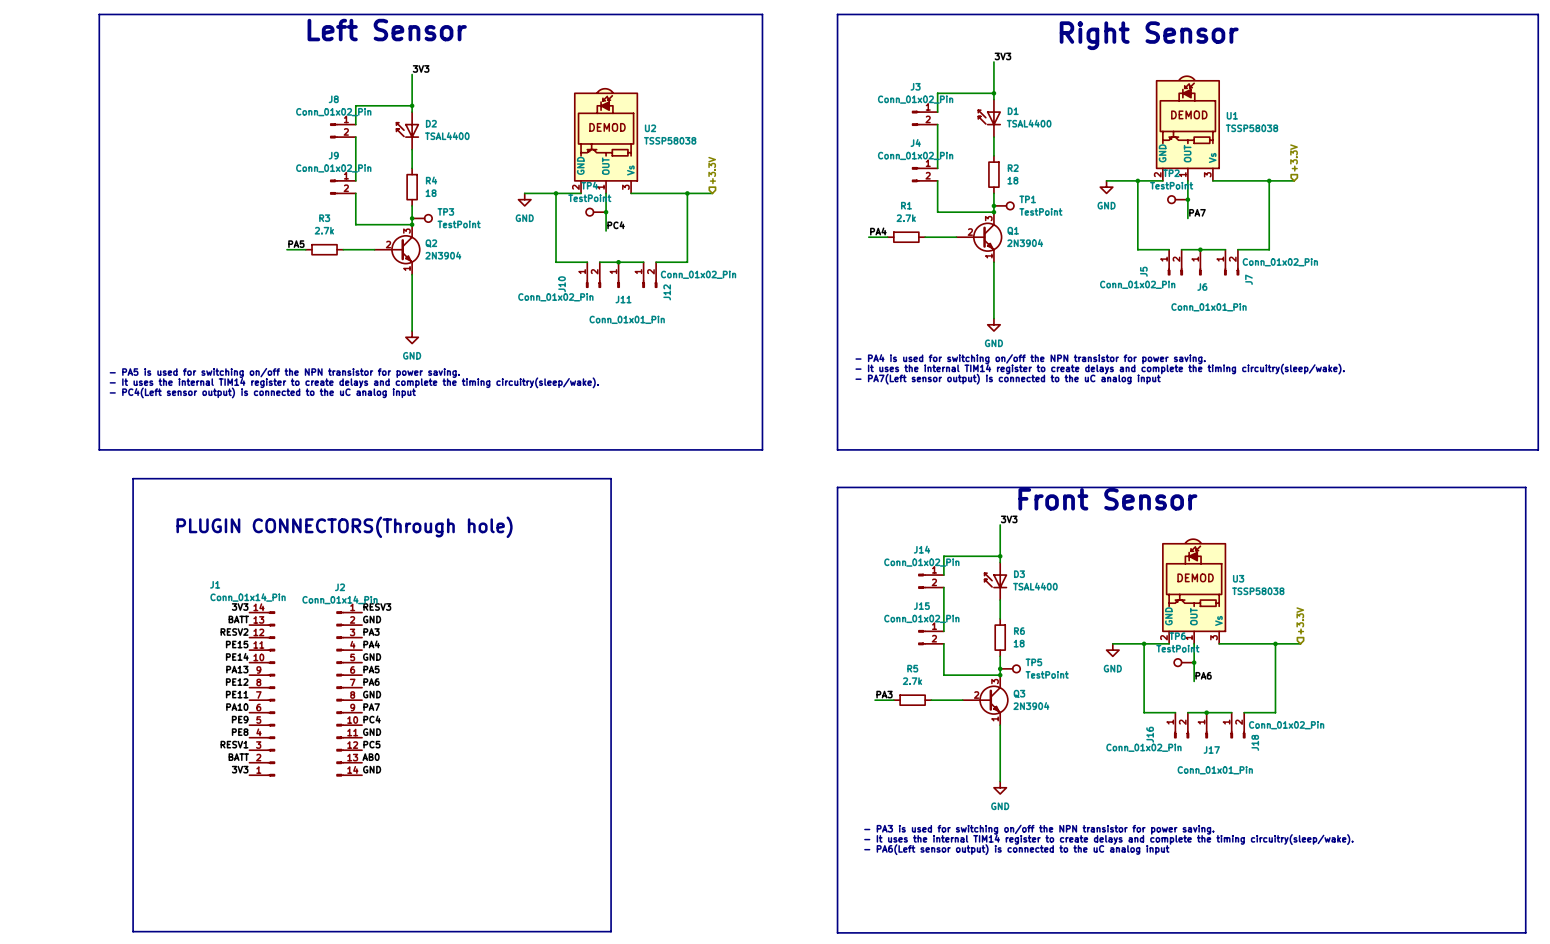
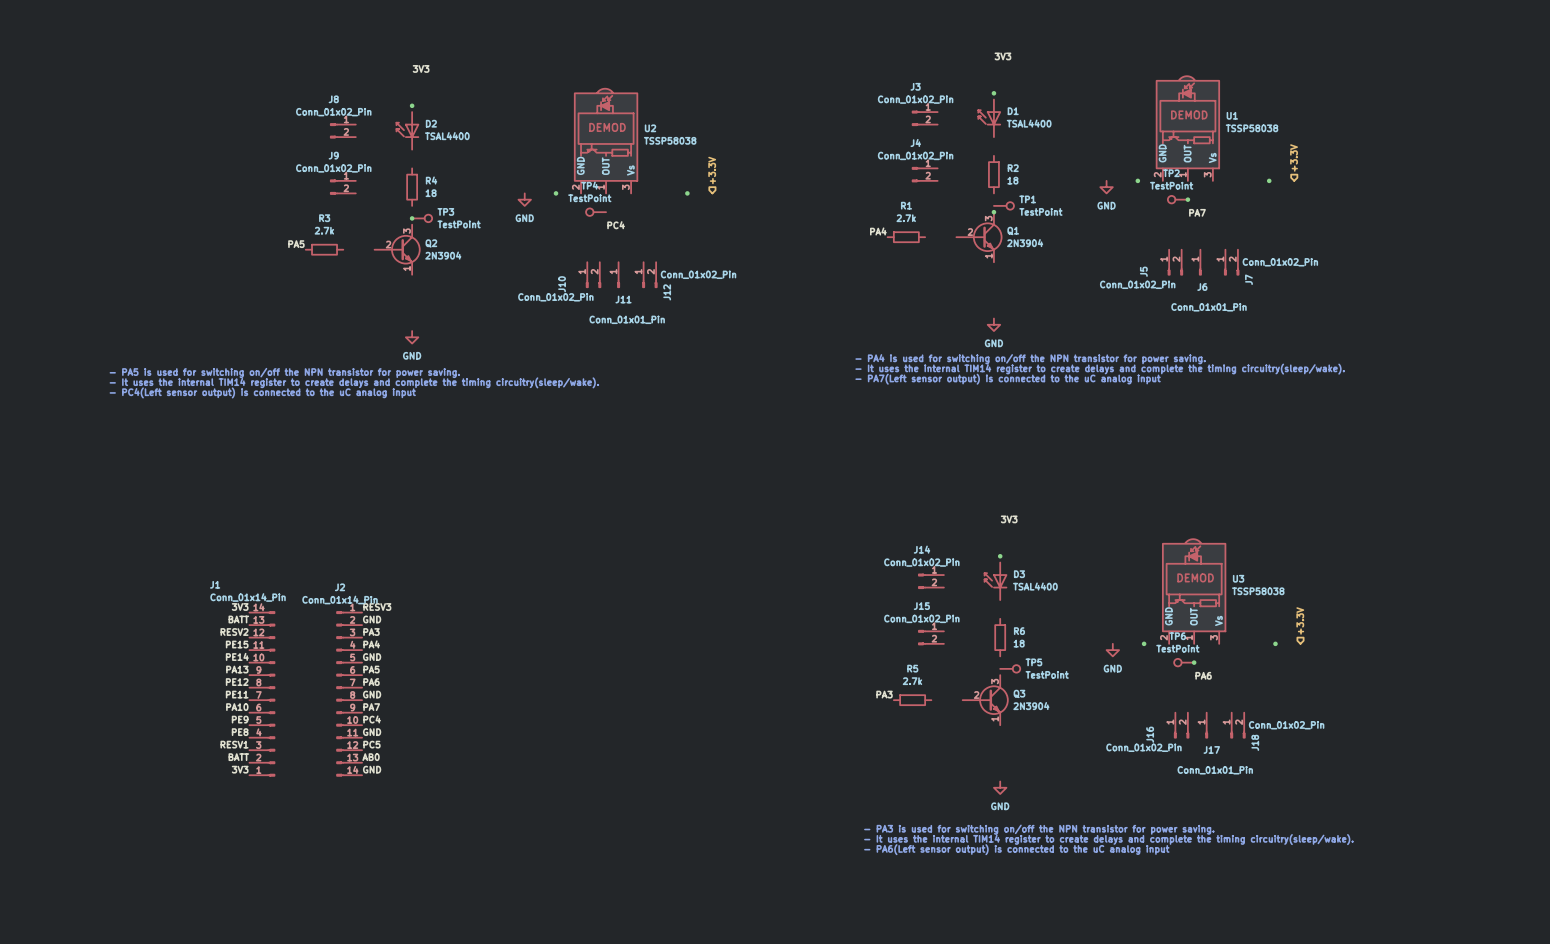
line: (99, 14) (762, 14) (762, 449) (99, 449) (99, 14) -> none
line: (837, 14) (1538, 14) (1538, 449) (837, 449) (837, 14) -> none
text: Left Sensor (387, 30) -> none
text: Right Sensor (1149, 35) -> none
wire: (993, 62) (993, 99) -> none
wire: (412, 74) (412, 112) -> none
wire: (993, 93) (937, 93) (937, 112) -> none
wire: (412, 105) (355, 105) (355, 124) -> none
wire: (937, 124) (937, 168) -> none
wire: (355, 137) (355, 180) -> none
wire: (993, 137) (993, 155) -> none
wire: (412, 149) (412, 168) -> none
wire: (937, 180) (937, 212) (993, 212) (993, 193) -> none
wire: (1106, 180) (1162, 180) -> none
wire: (1137, 180) (1137, 249) (1169, 249) -> none
wire: (1187, 180) (1187, 218) -> none
wire: (1212, 180) (1294, 180) -> none
wire: (1269, 180) (1269, 249) (1237, 249) -> none
wire: (355, 193) (355, 224) (412, 224) (412, 205) -> none
wire: (524, 193) (581, 193) -> none
wire: (556, 193) (556, 262) (587, 262) -> none
wire: (606, 193) (606, 230) -> none
wire: (631, 193) (712, 193) -> none
wire: (687, 193) (687, 262) (656, 262) -> none
junction: (993, 205) -> none
junction: (606, 212) -> none
junction: (412, 224) -> none
wire: (868, 237) (887, 237) -> none
wire: (925, 237) (956, 237) -> none
wire: (286, 249) (305, 249) -> none
wire: (343, 249) (374, 249) -> none
wire: (1181, 249) (1225, 249) -> none
junction: (1200, 249) -> none
wire: (599, 262) (643, 262) -> none
junction: (618, 262) -> none
wire: (993, 262) (993, 318) -> none
wire: (412, 274) (412, 331) -> none
line: (133, 478) (611, 478) (611, 931) (133, 931) (133, 478) -> none
line: (837, 487) (1525, 487) (1525, 932) (837, 932) (837, 487) -> none
text: Front Sensor (1107, 499) -> none
wire: (1000, 524) (1000, 562) -> none
text: PLUGIN CONNECTORS(Through hole) (344, 527) -> none
wire: (1000, 556) (943, 556) (943, 575) -> none
wire: (943, 587) (943, 631) -> none
wire: (1000, 600) (1000, 618) -> none
wire: (943, 643) (943, 675) (1000, 675) (1000, 656) -> none
wire: (1112, 643) (1169, 643) -> none
wire: (1144, 643) (1144, 712) (1175, 712) -> none
wire: (1194, 643) (1194, 681) -> none
wire: (1219, 643) (1300, 643) -> none
wire: (1275, 643) (1275, 712) (1244, 712) -> none
junction: (1000, 668) -> none
junction: (1000, 675) -> none
wire: (875, 700) (893, 700) -> none
wire: (931, 700) (962, 700) -> none
wire: (1187, 712) (1231, 712) -> none
junction: (1206, 712) -> none
wire: (1000, 725) (1000, 781) -> none

